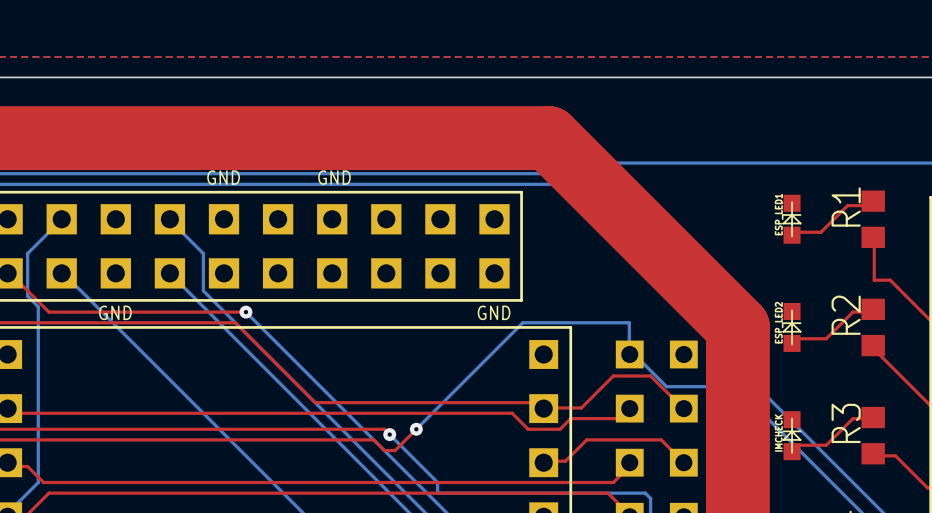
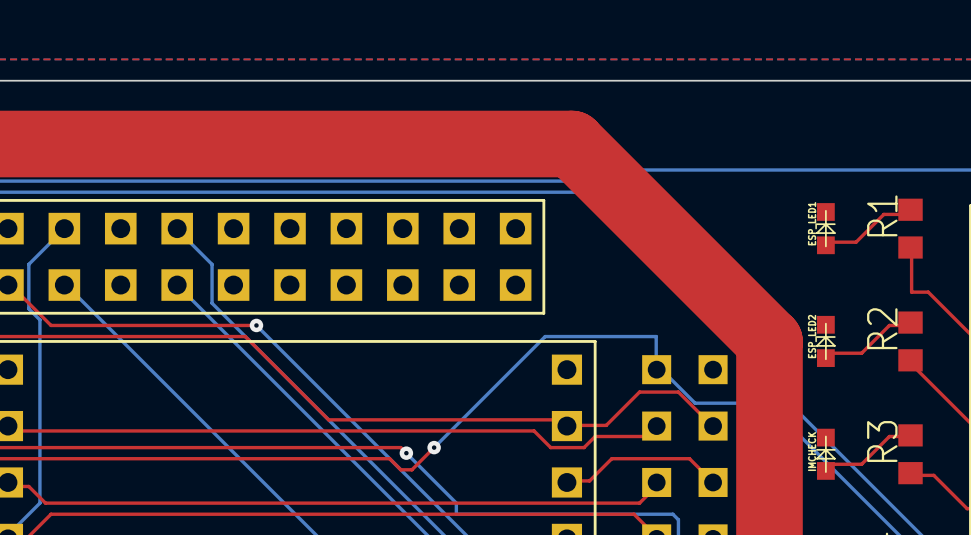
text: GND (223, 177) -> none
text: GND (334, 177) -> none
text: GND (115, 312) -> none
text: GND (494, 312) -> none

